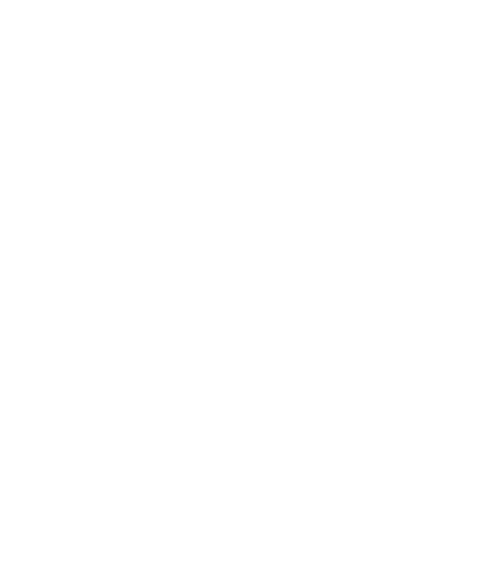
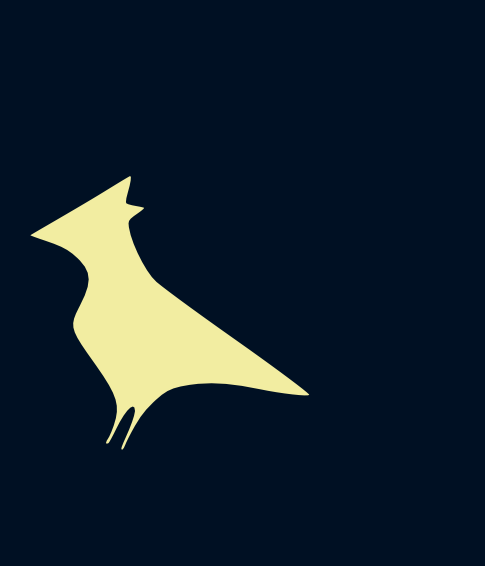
drawing: none -> [30, 175, 310, 450]

